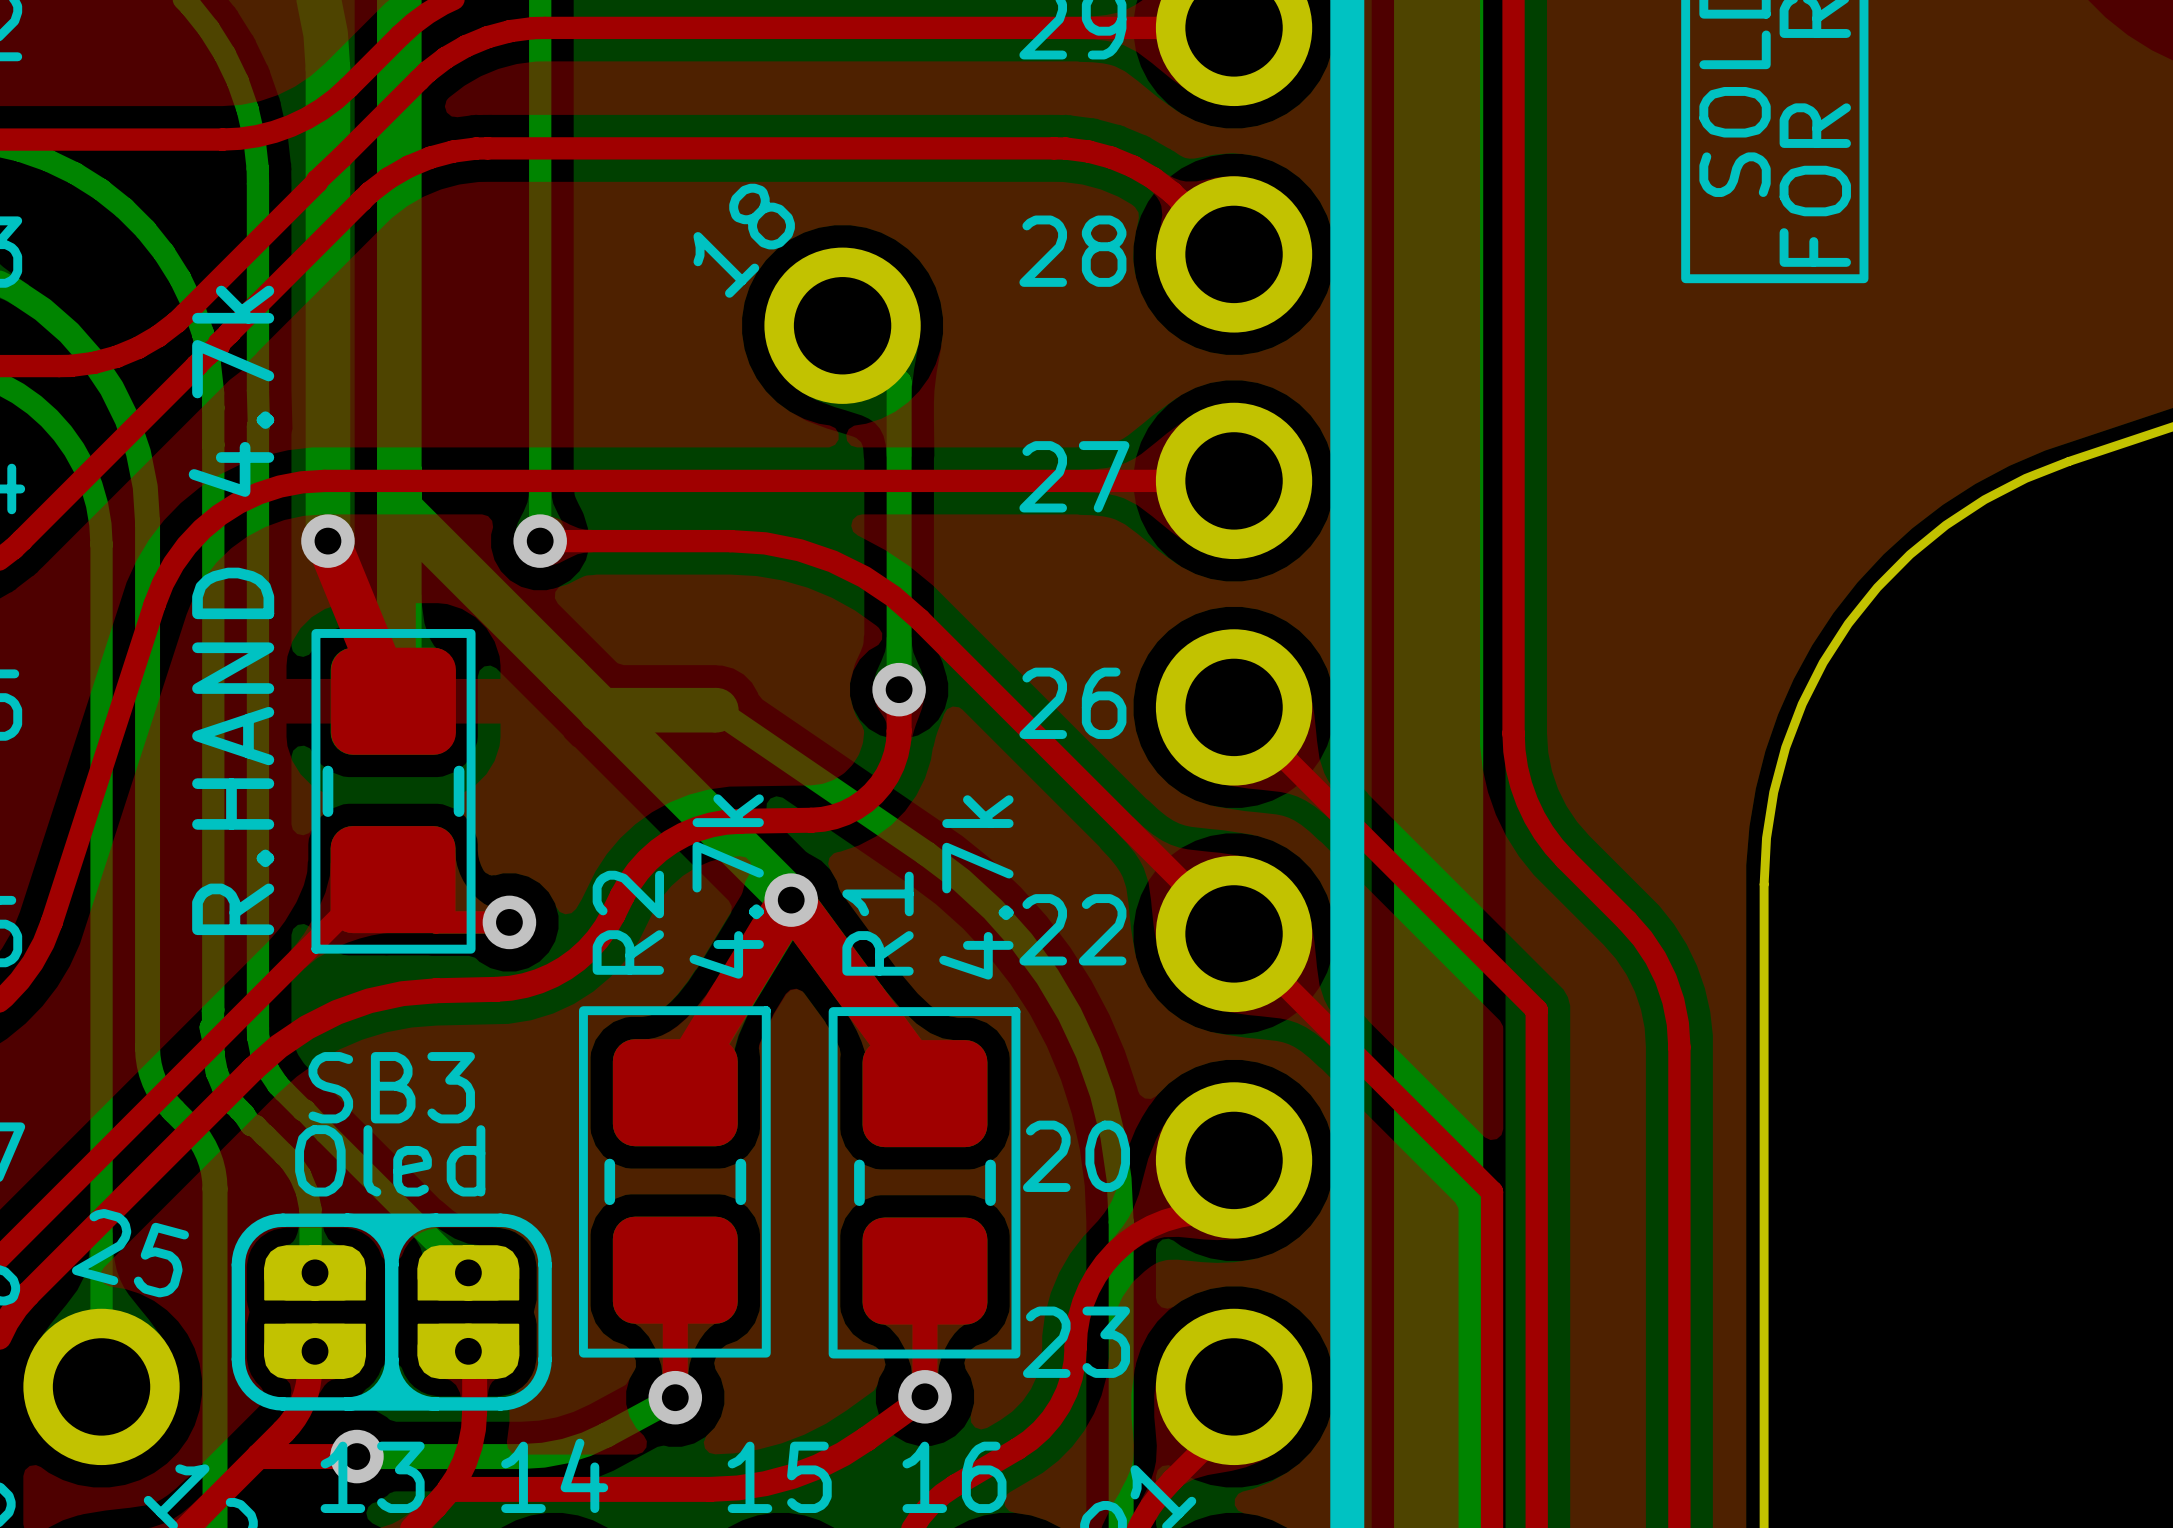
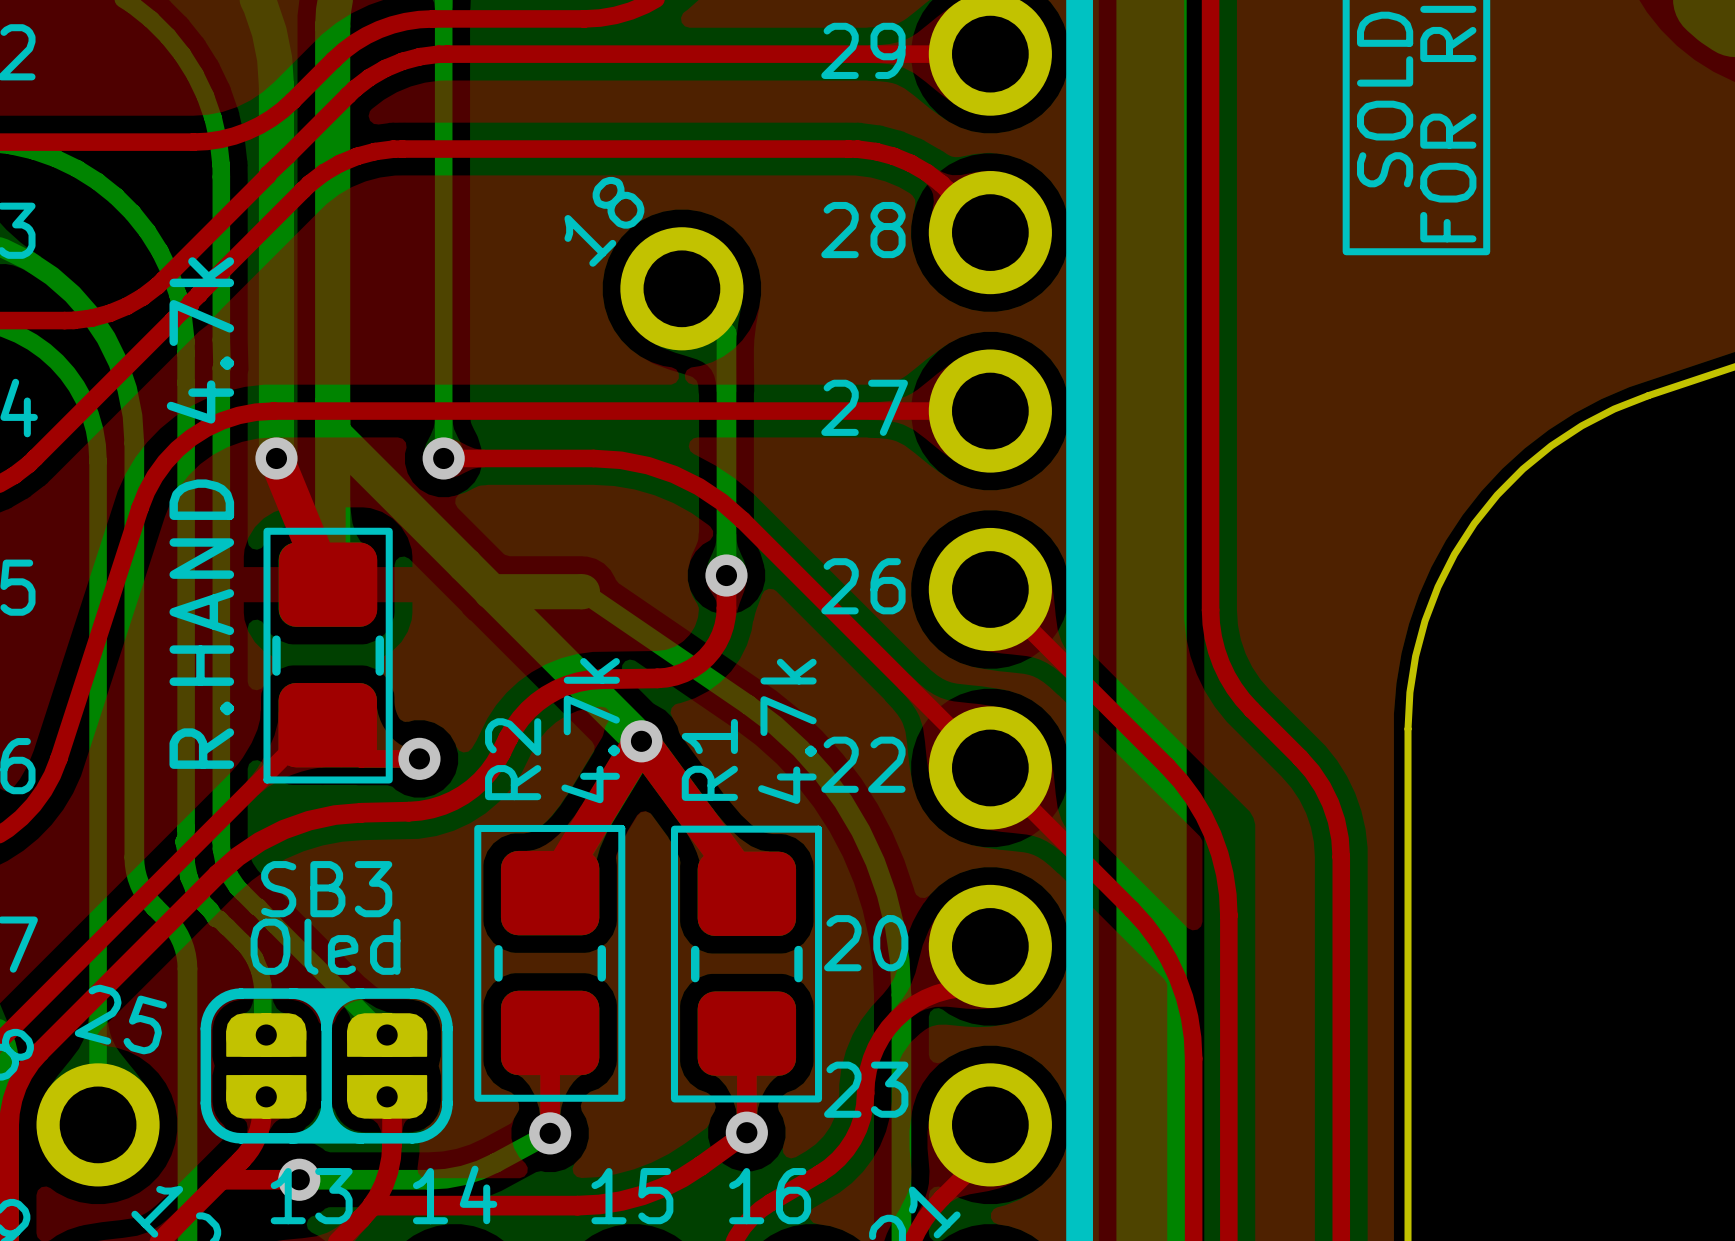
top track: (1458, 931) (1536, 1010) (1536, 1120) -> (1167, 766) (1193, 798) (1212, 834) (1224, 874) (1228, 915)
top track: (1413, 1113) (1492, 1191) (1492, 1302) -> (1131, 909) (1158, 941) (1177, 977) (1189, 1017) (1193, 1058)

